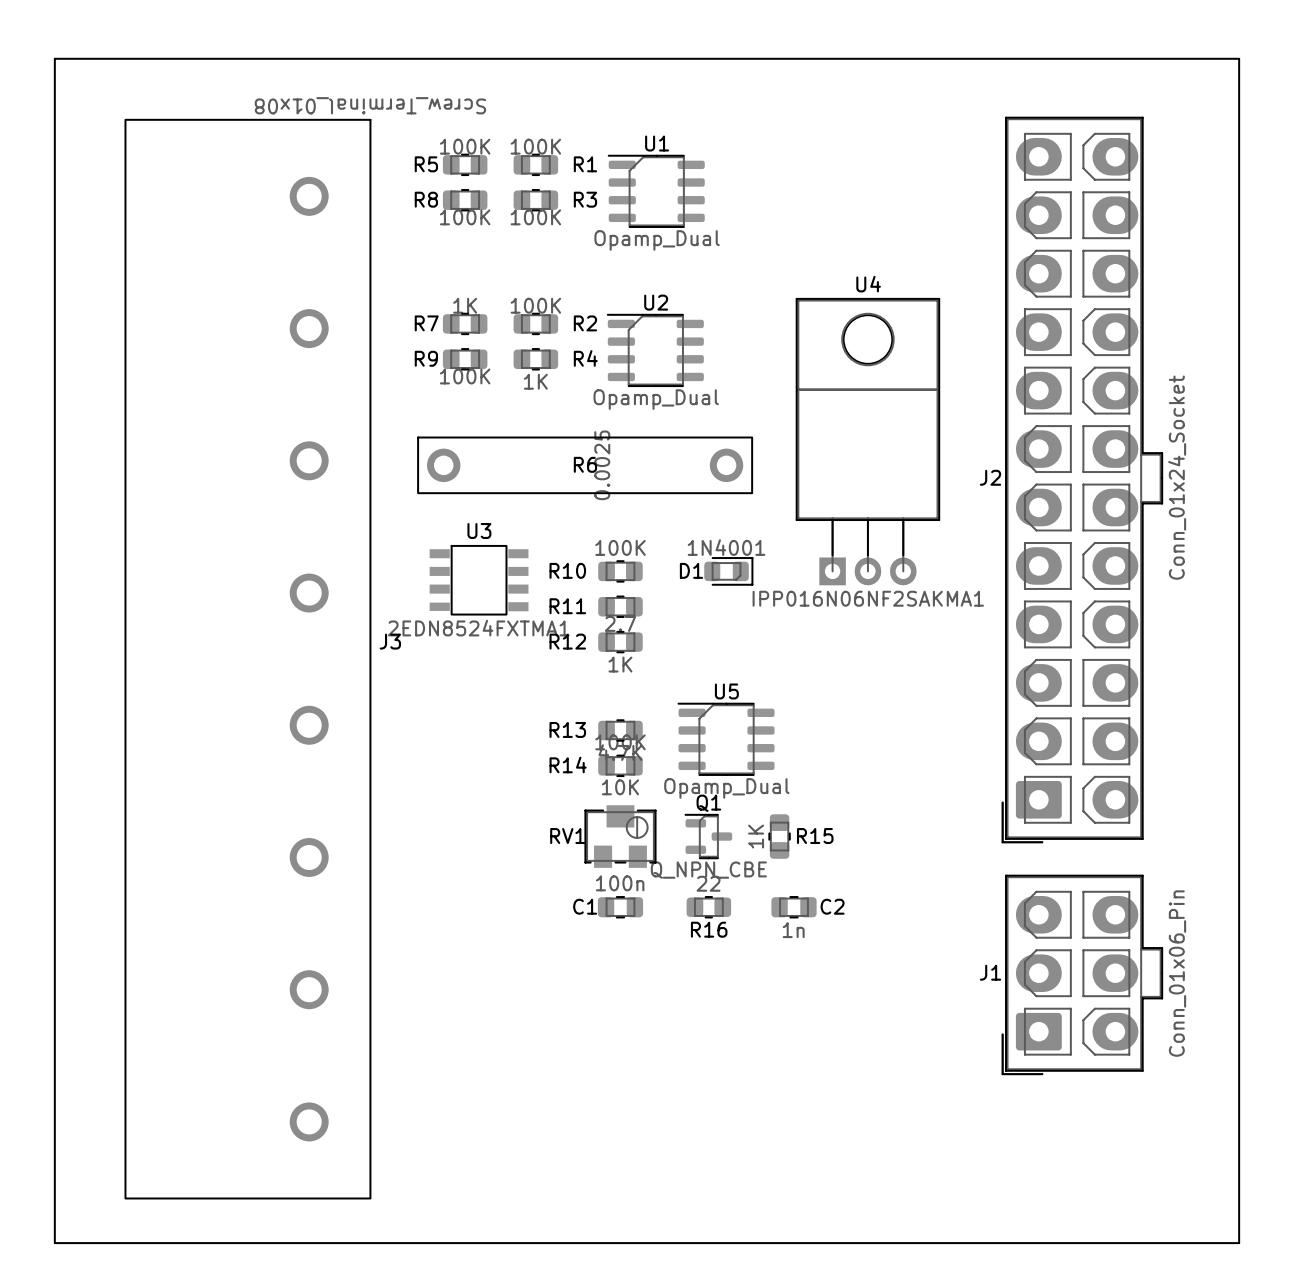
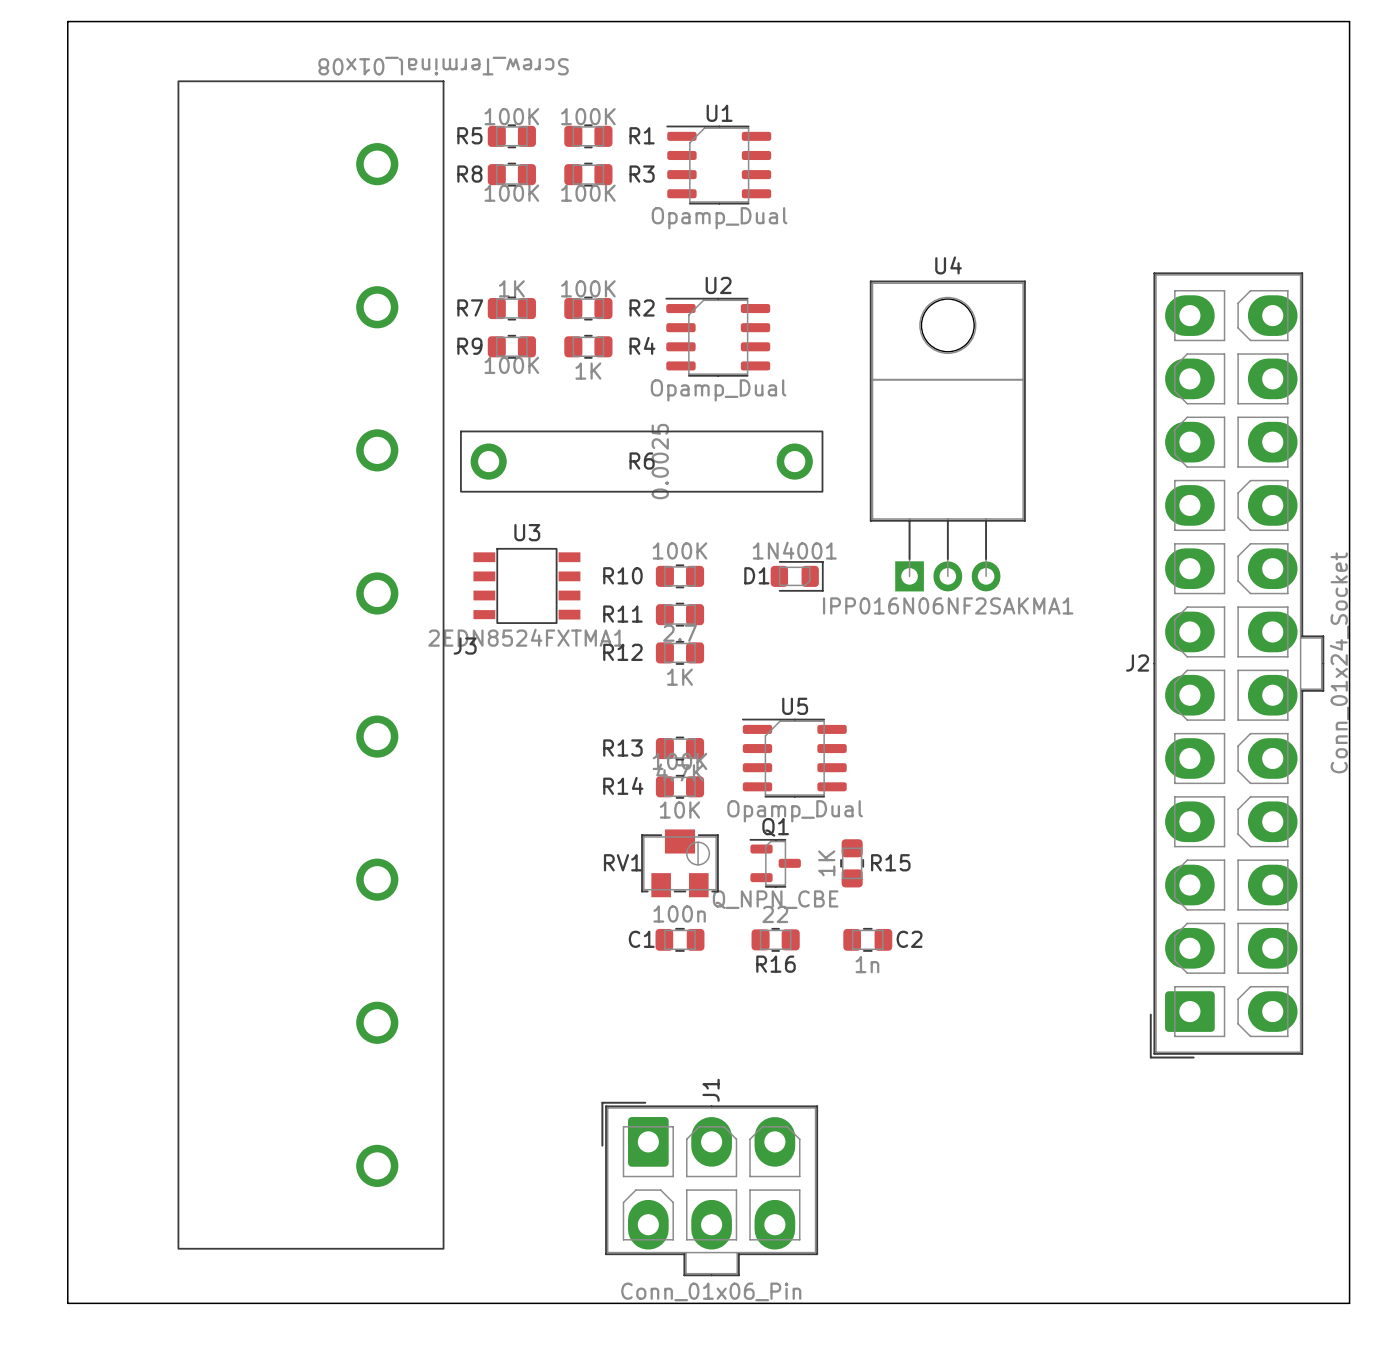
J2 position: (1082, 479) -> (1237, 665)
J3 position: (247, 659) -> (310, 665)
J1 rotation: 0° (1082, 974) -> 90° clockwise (709, 1189)
J1 position: (1082, 974) -> (709, 1189)

